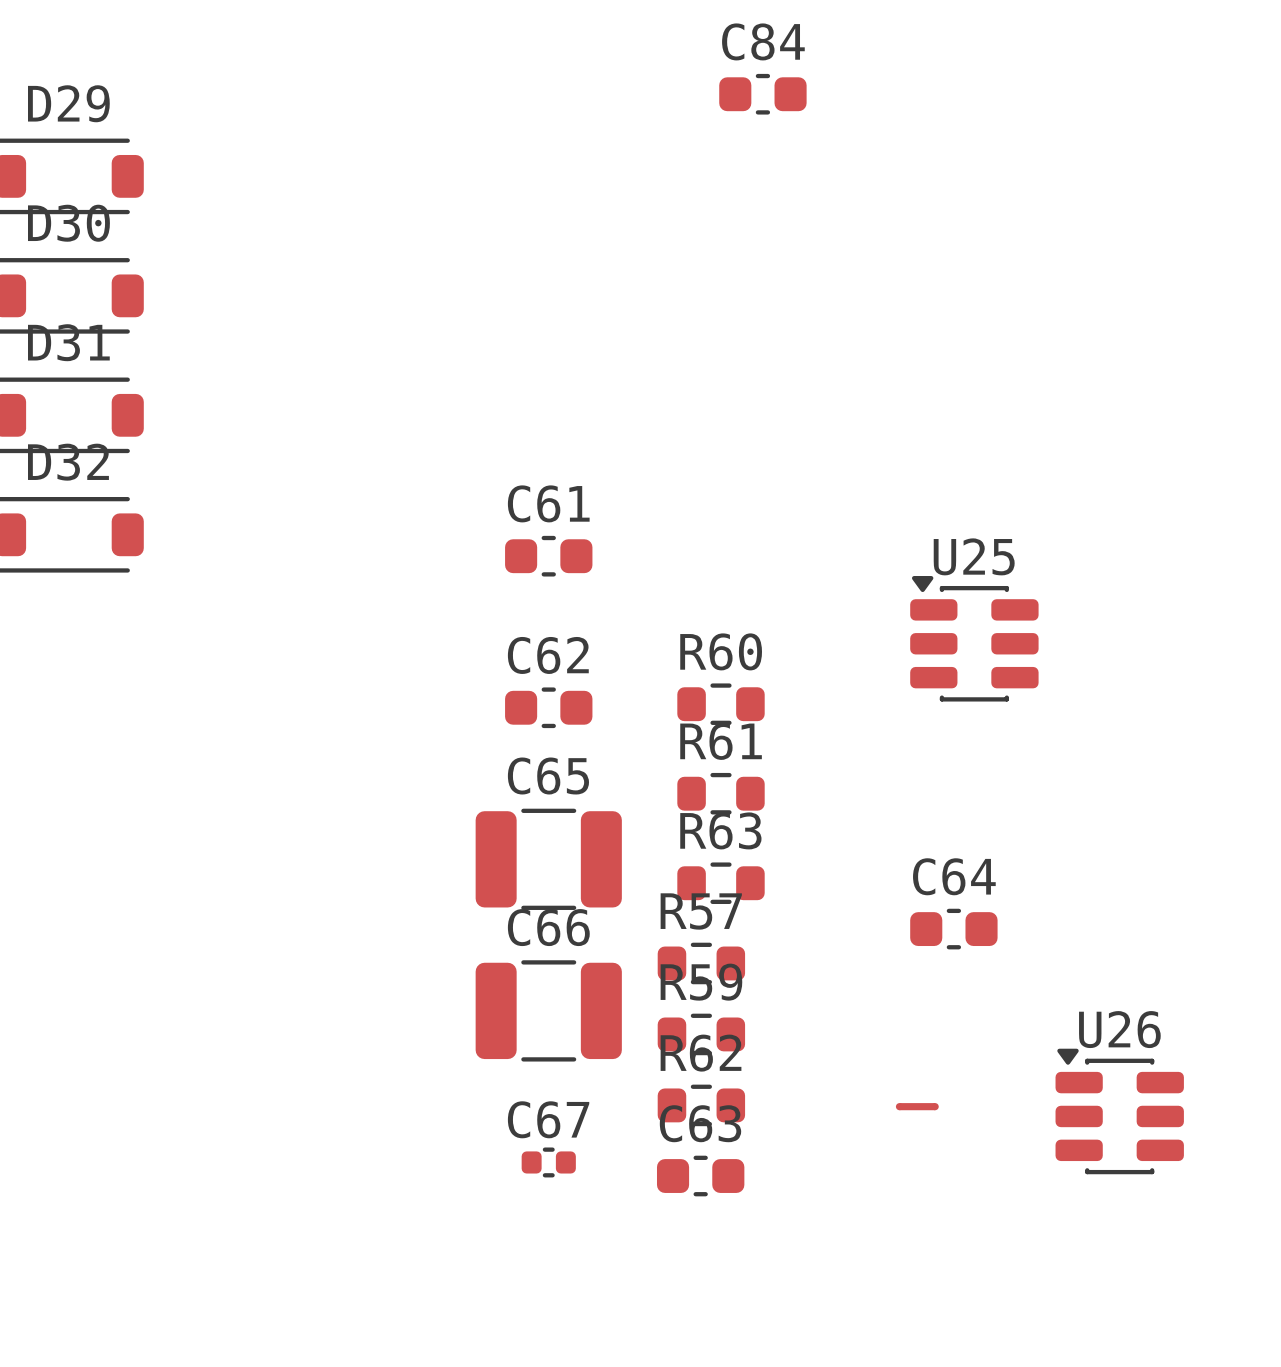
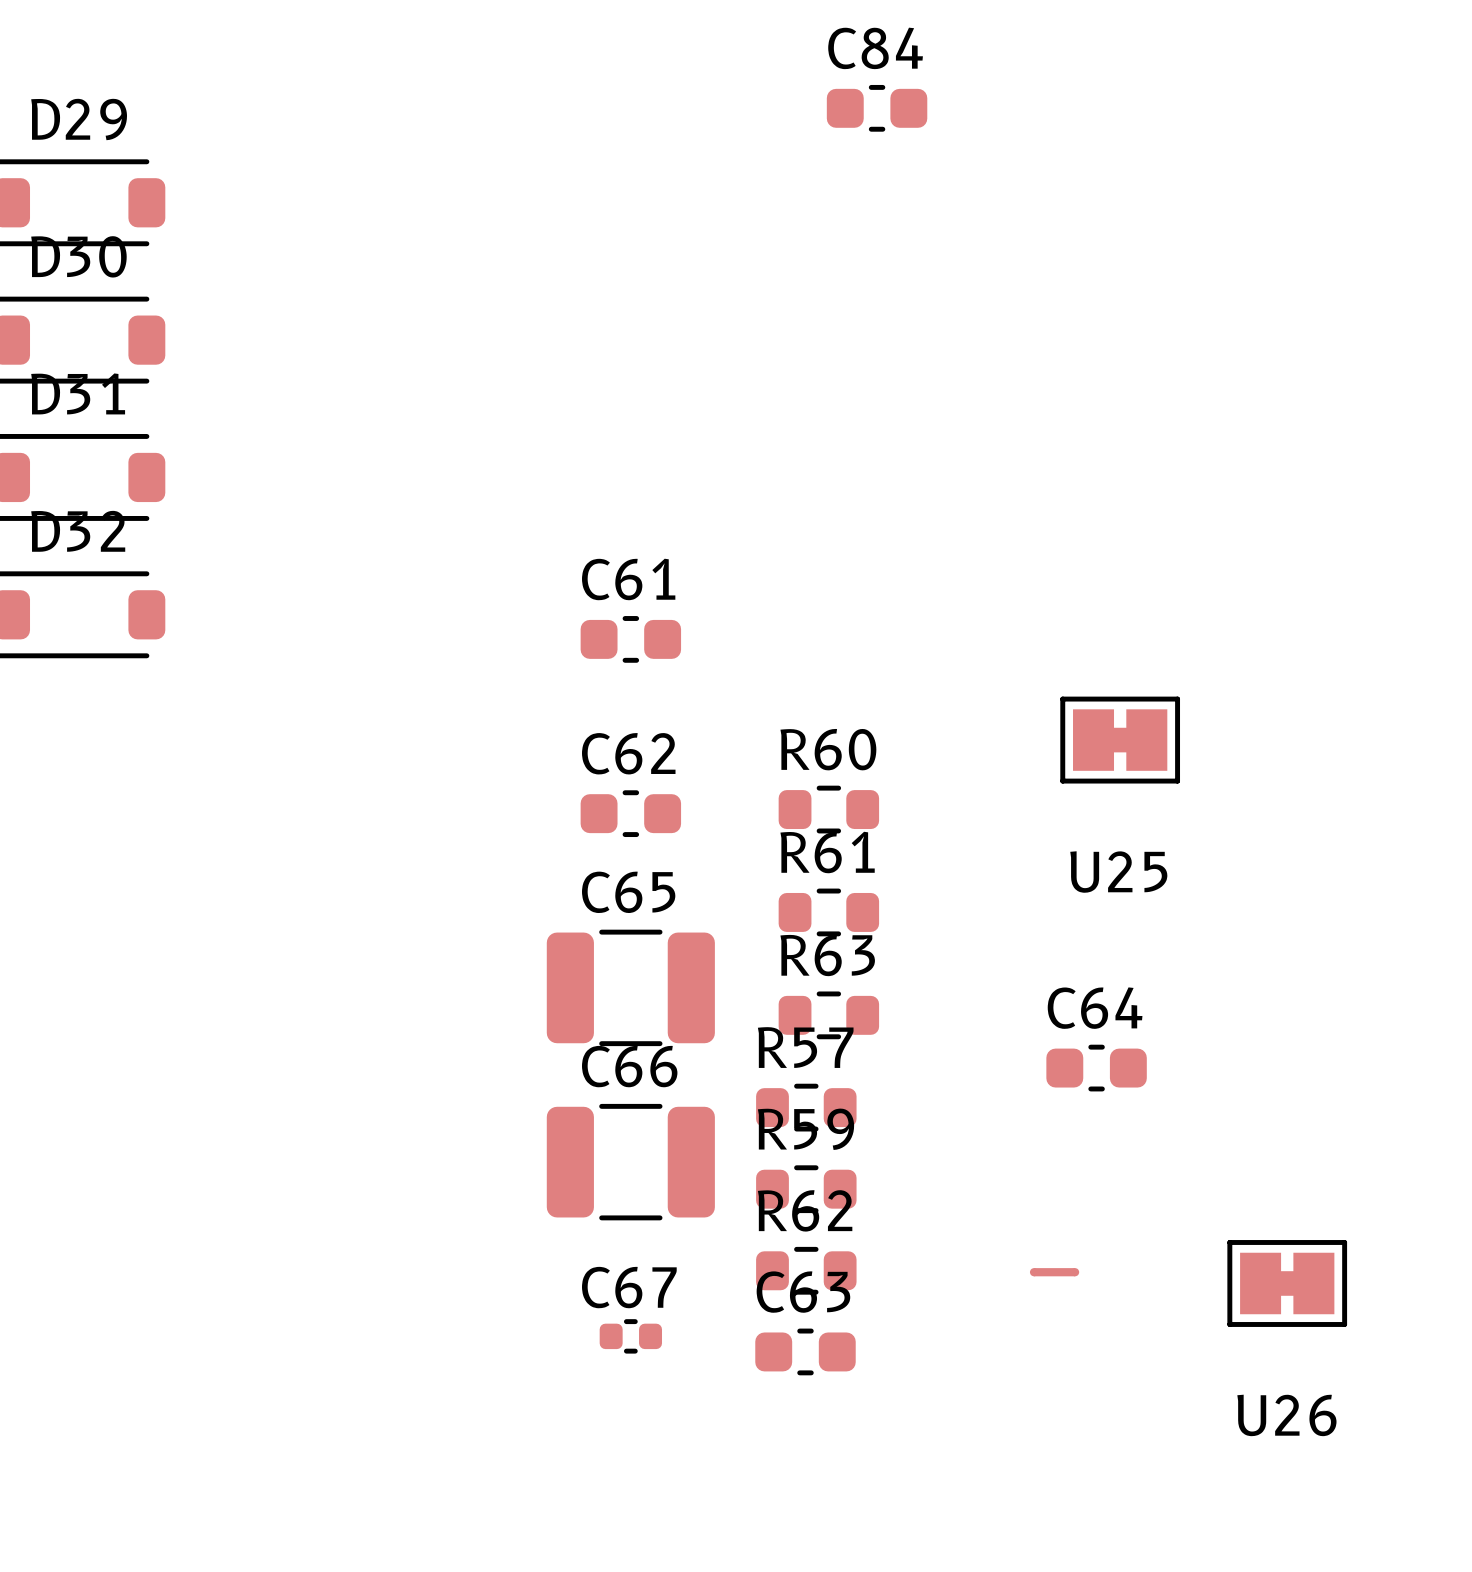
U25 name position: U25 (974, 556) -> U25 (1118, 872)
U25 footprint: [910, 576, 1039, 702] -> [1060, 696, 1181, 784]
U26 name position: U26 (1119, 1029) -> U26 (1286, 1415)
U26 footprint: [1055, 1048, 1184, 1175] -> [1227, 1240, 1348, 1327]

